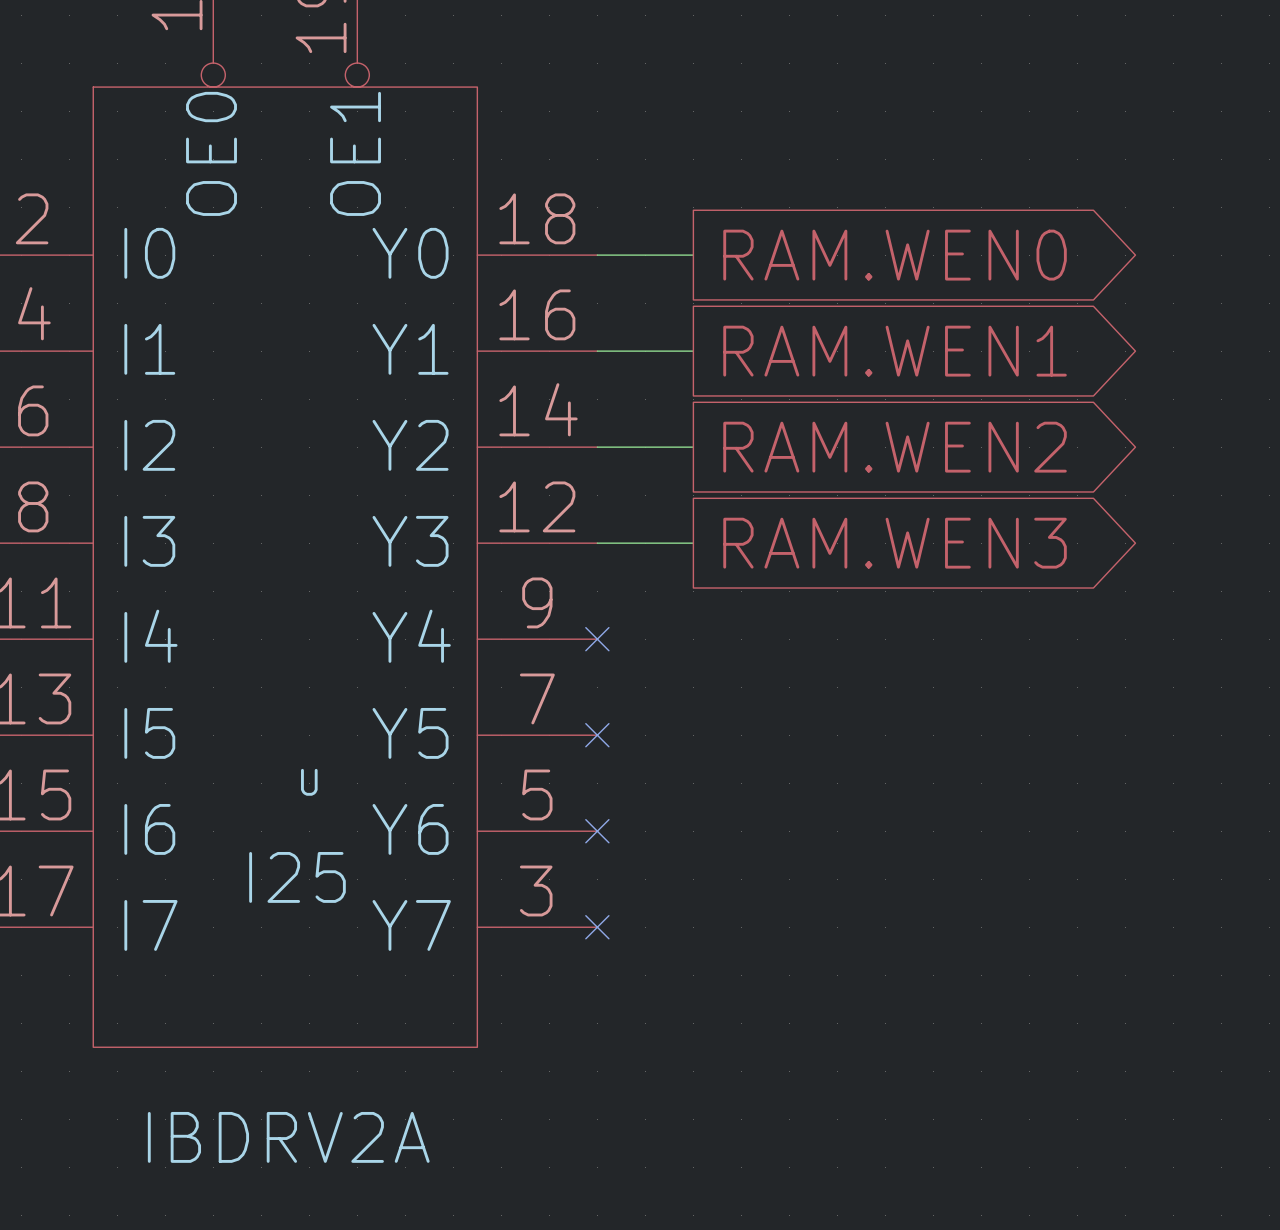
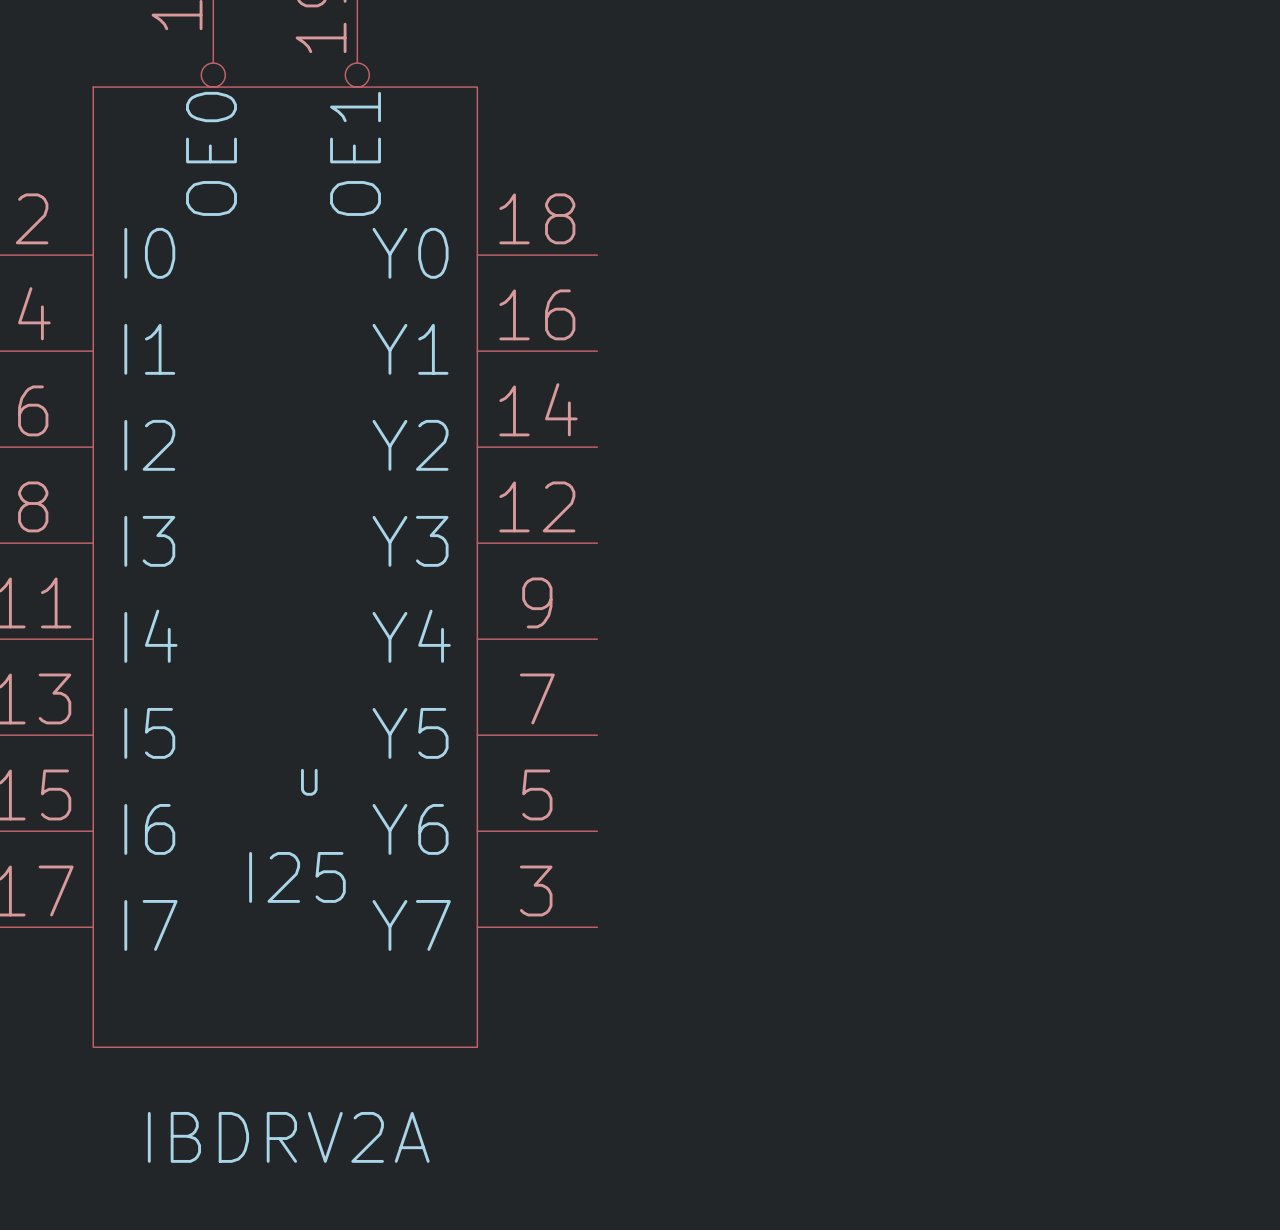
wire: (597, 255) (693, 255) -> none
global label: RAM.WEN0 (895, 255) -> none
wire: (597, 351) (693, 351) -> none
global label: RAM.WEN1 (895, 351) -> none
wire: (597, 447) (693, 447) -> none
global label: RAM.WEN2 (895, 447) -> none
wire: (597, 543) (693, 543) -> none
global label: RAM.WEN3 (895, 543) -> none
no-connect mark: (597, 639) -> none
no-connect mark: (597, 735) -> none
no-connect mark: (597, 831) -> none
no-connect mark: (597, 927) -> none

